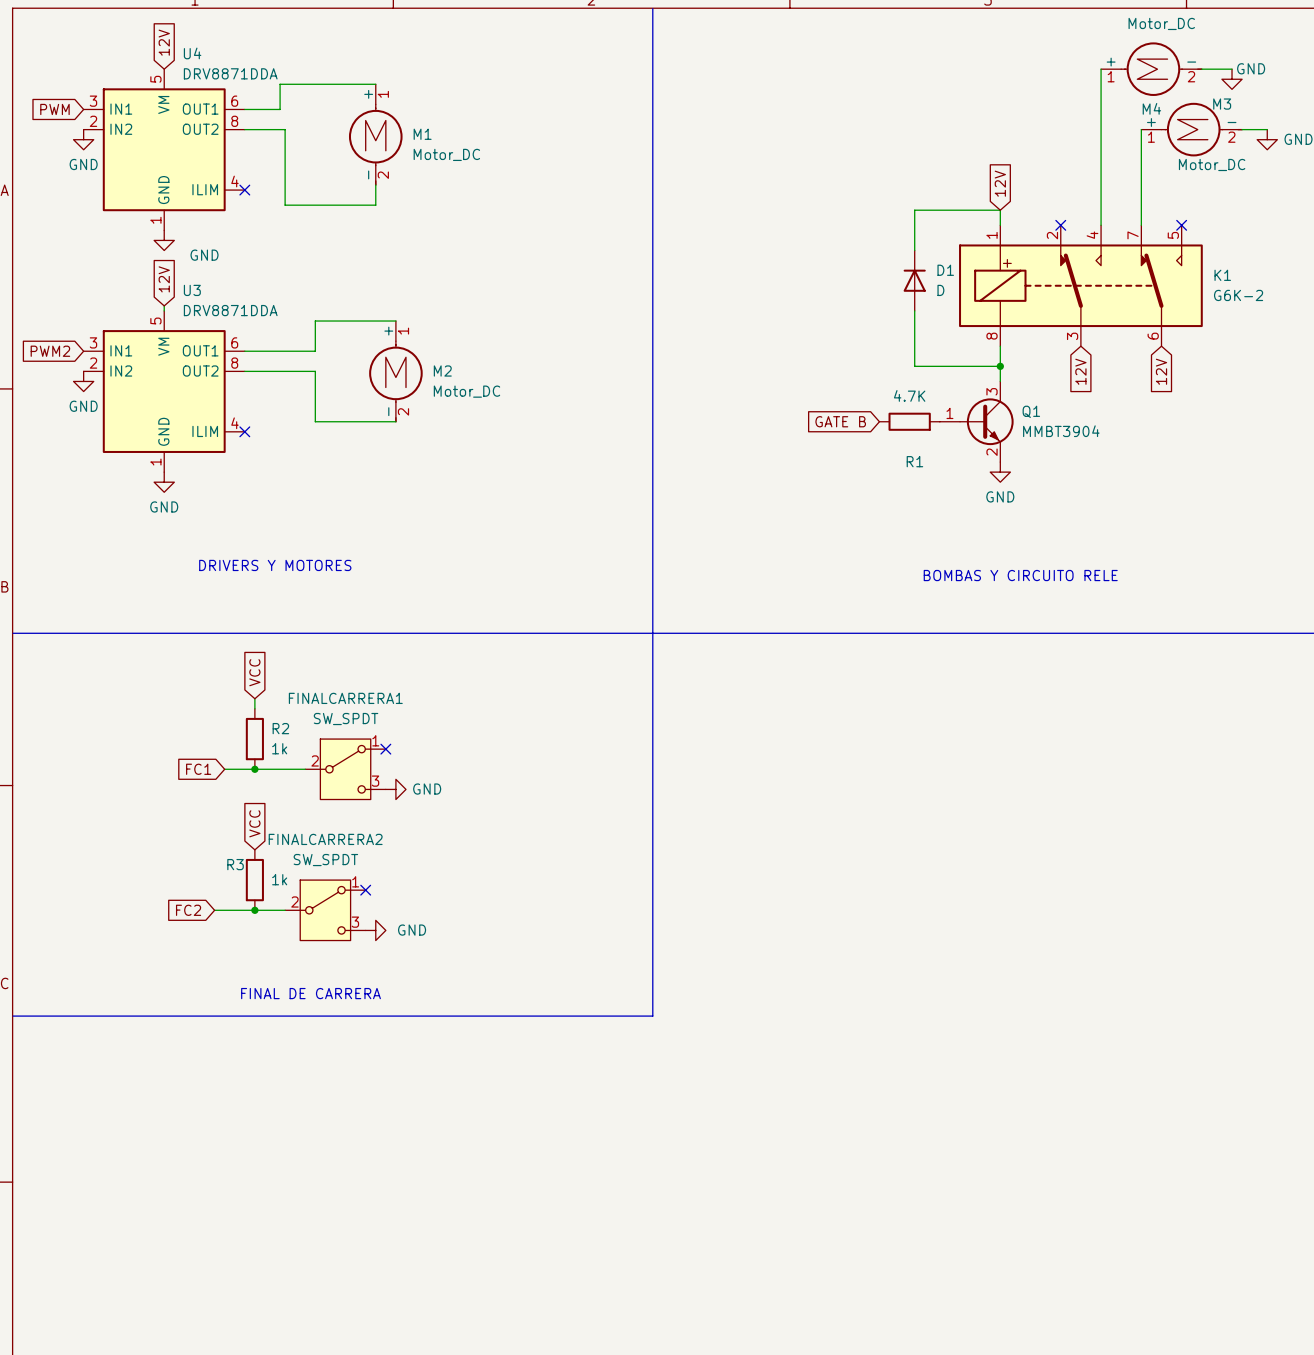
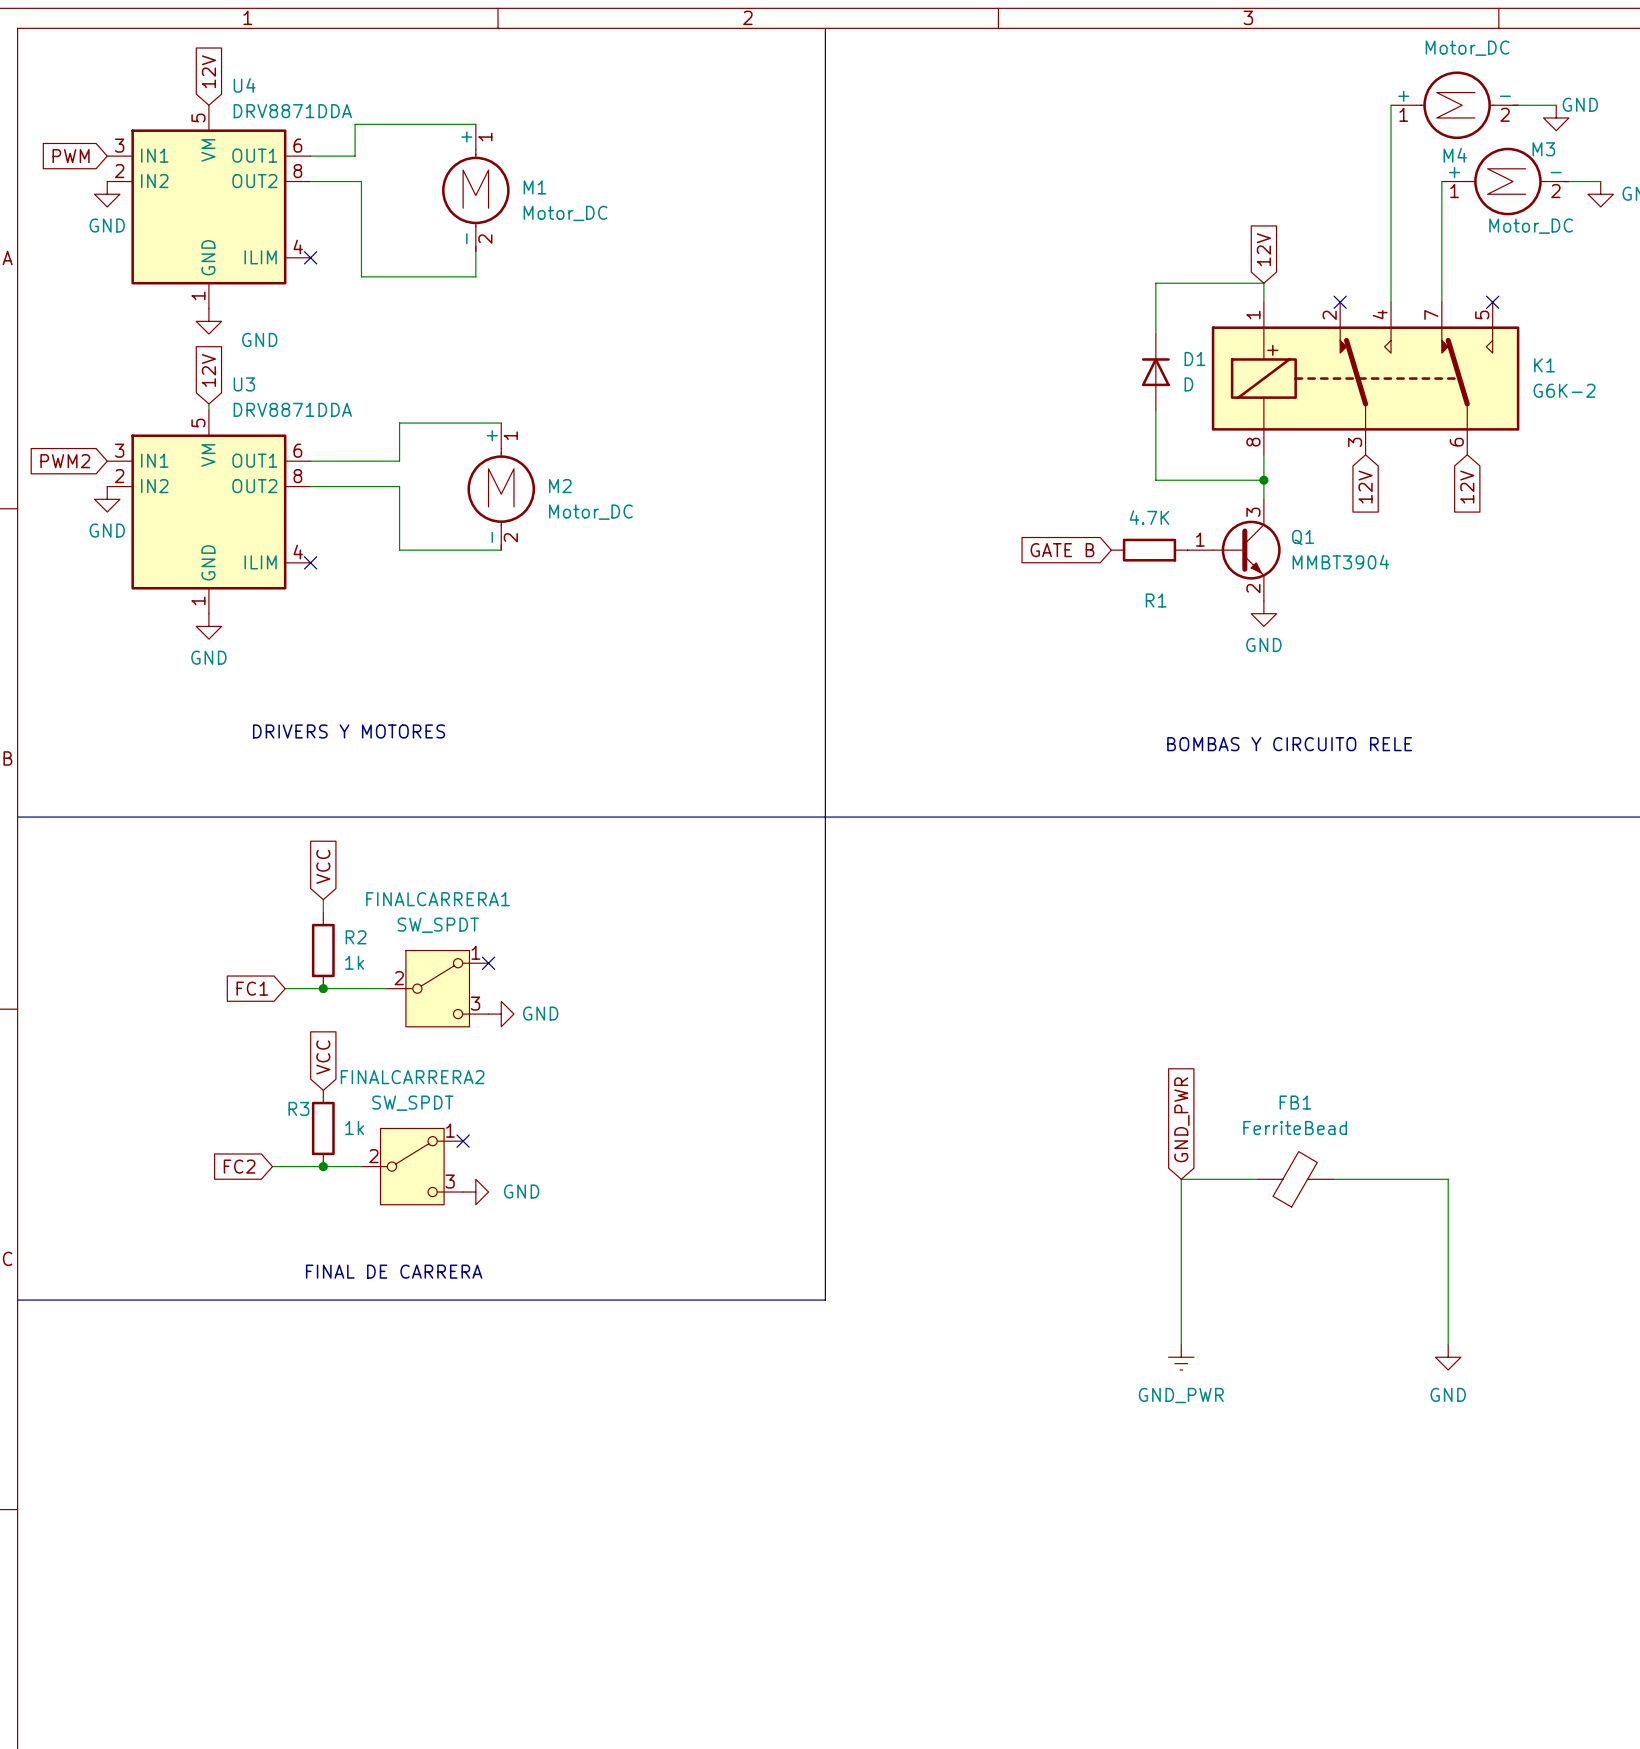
global label: none -> GND_PWR (1181, 1119)
wire: none -> (1257, 1179) (1181, 1179) (1181, 1344)
FB1: none -> FerriteBead (1295, 1179)
wire: none -> (1333, 1179) (1448, 1179) (1448, 1344)
power symbol: none -> GND_PWR (1181, 1357)
power symbol: none -> GND (1448, 1357)

